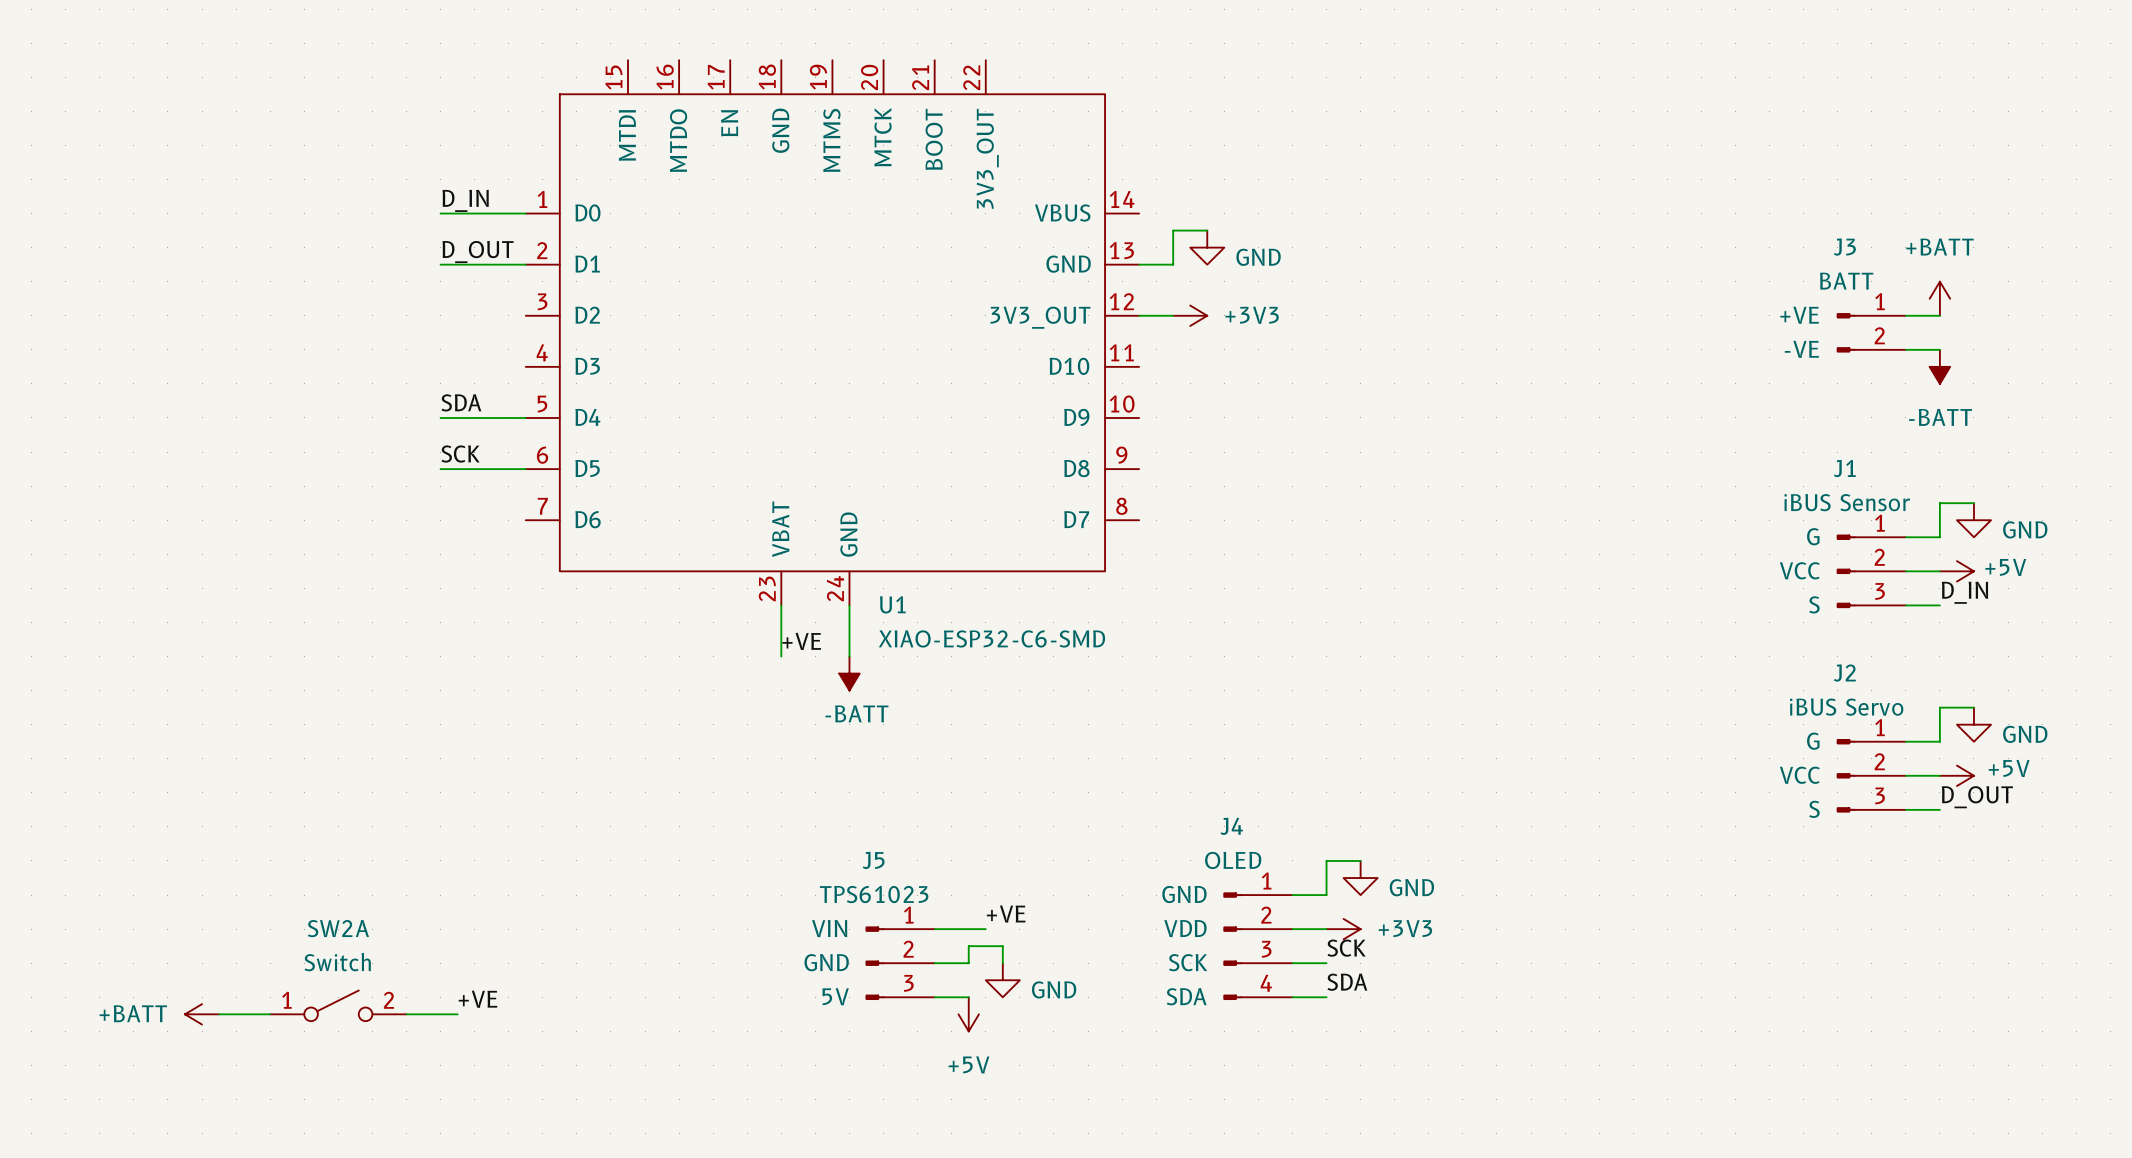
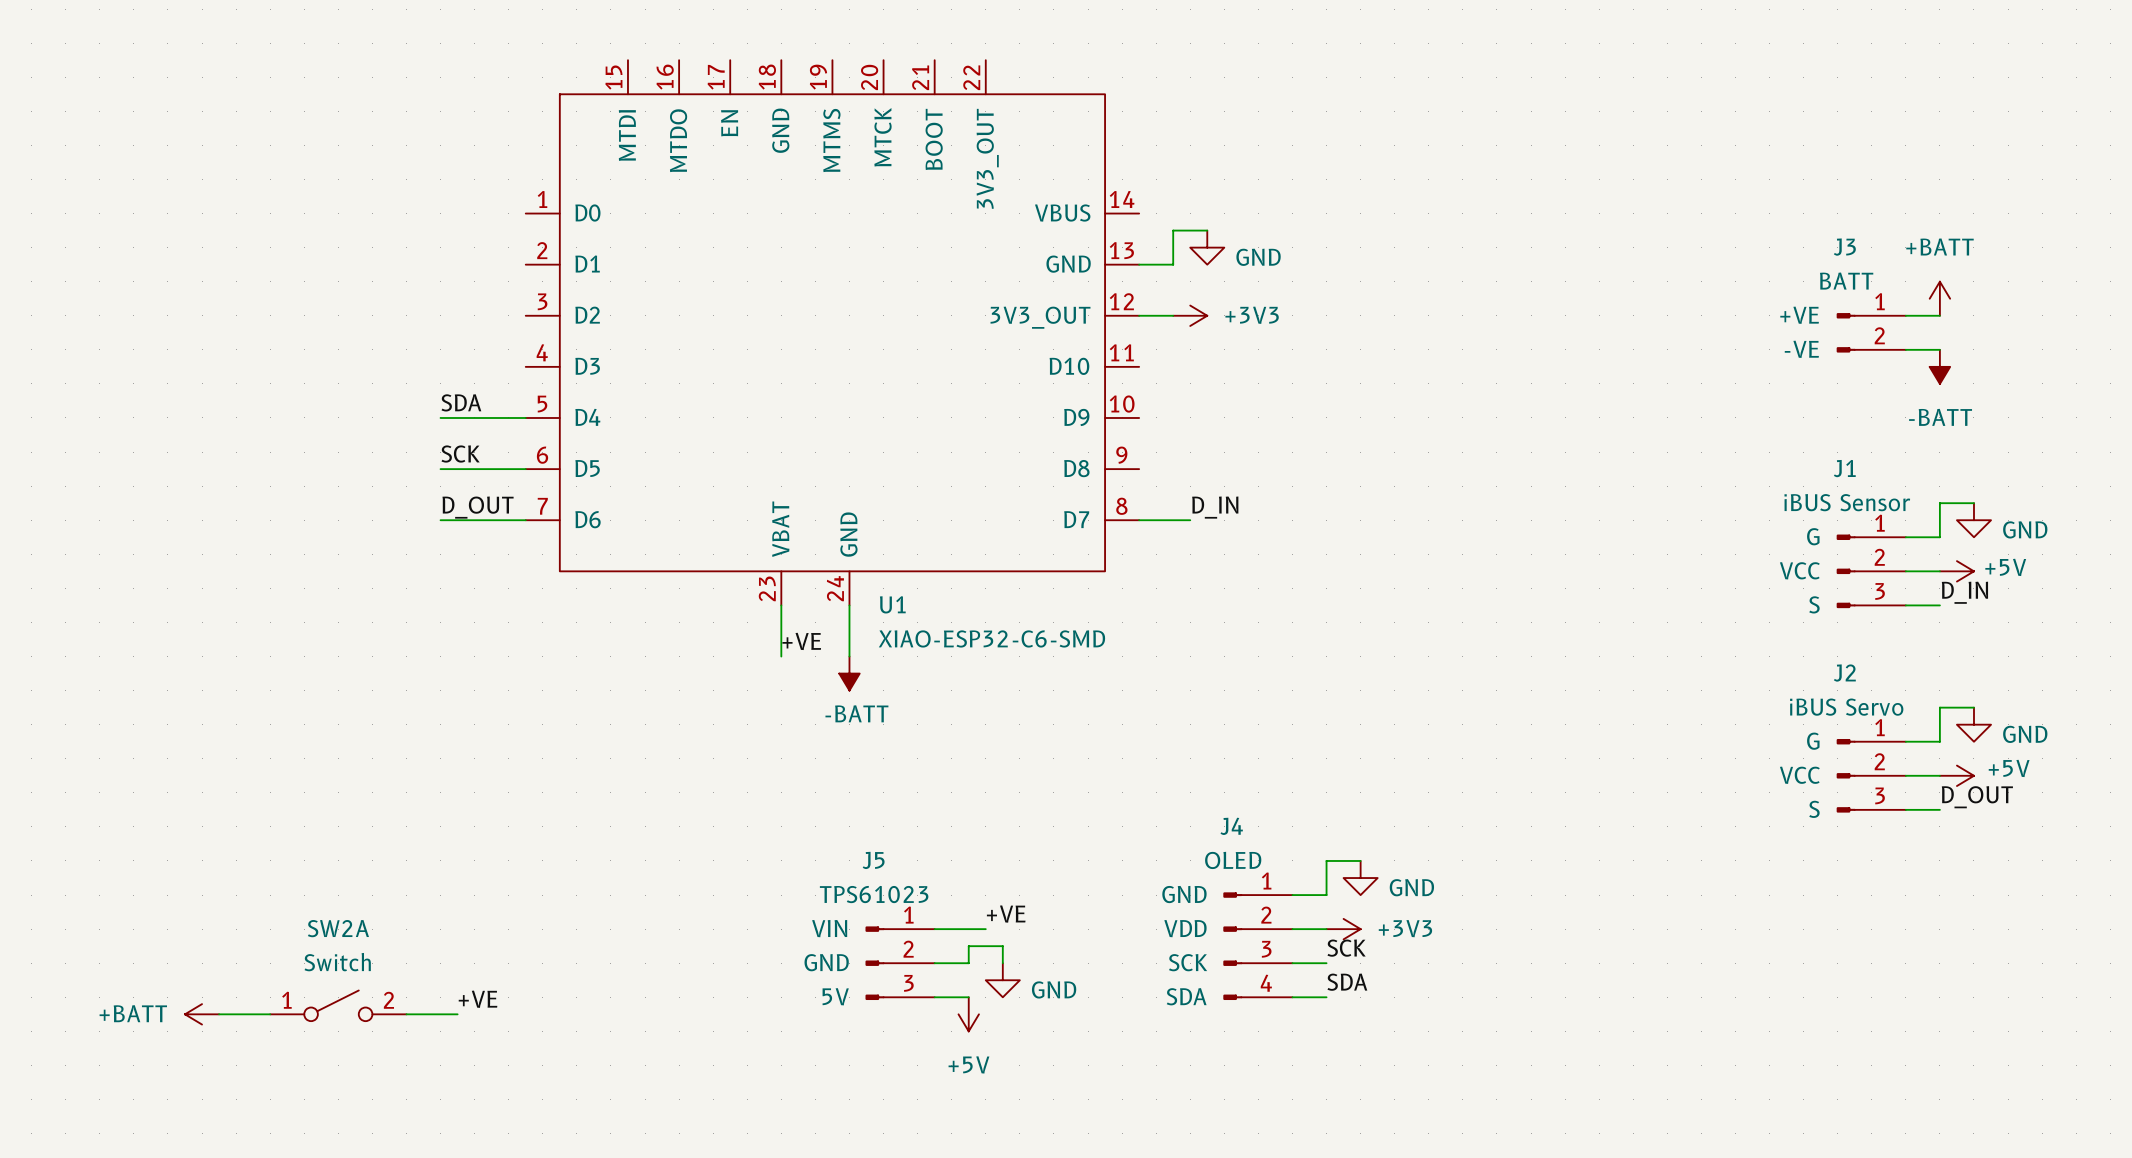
label: D_IN (465, 200) -> none
wire: (440, 213) (525, 213) -> none
label position: D_OUT (478, 252) -> D_OUT (478, 507)
wire: (440, 264) (525, 264) -> (440, 520) (525, 520)
label: none -> D_IN (1215, 507)
wire: none -> (1139, 520) (1190, 520)

